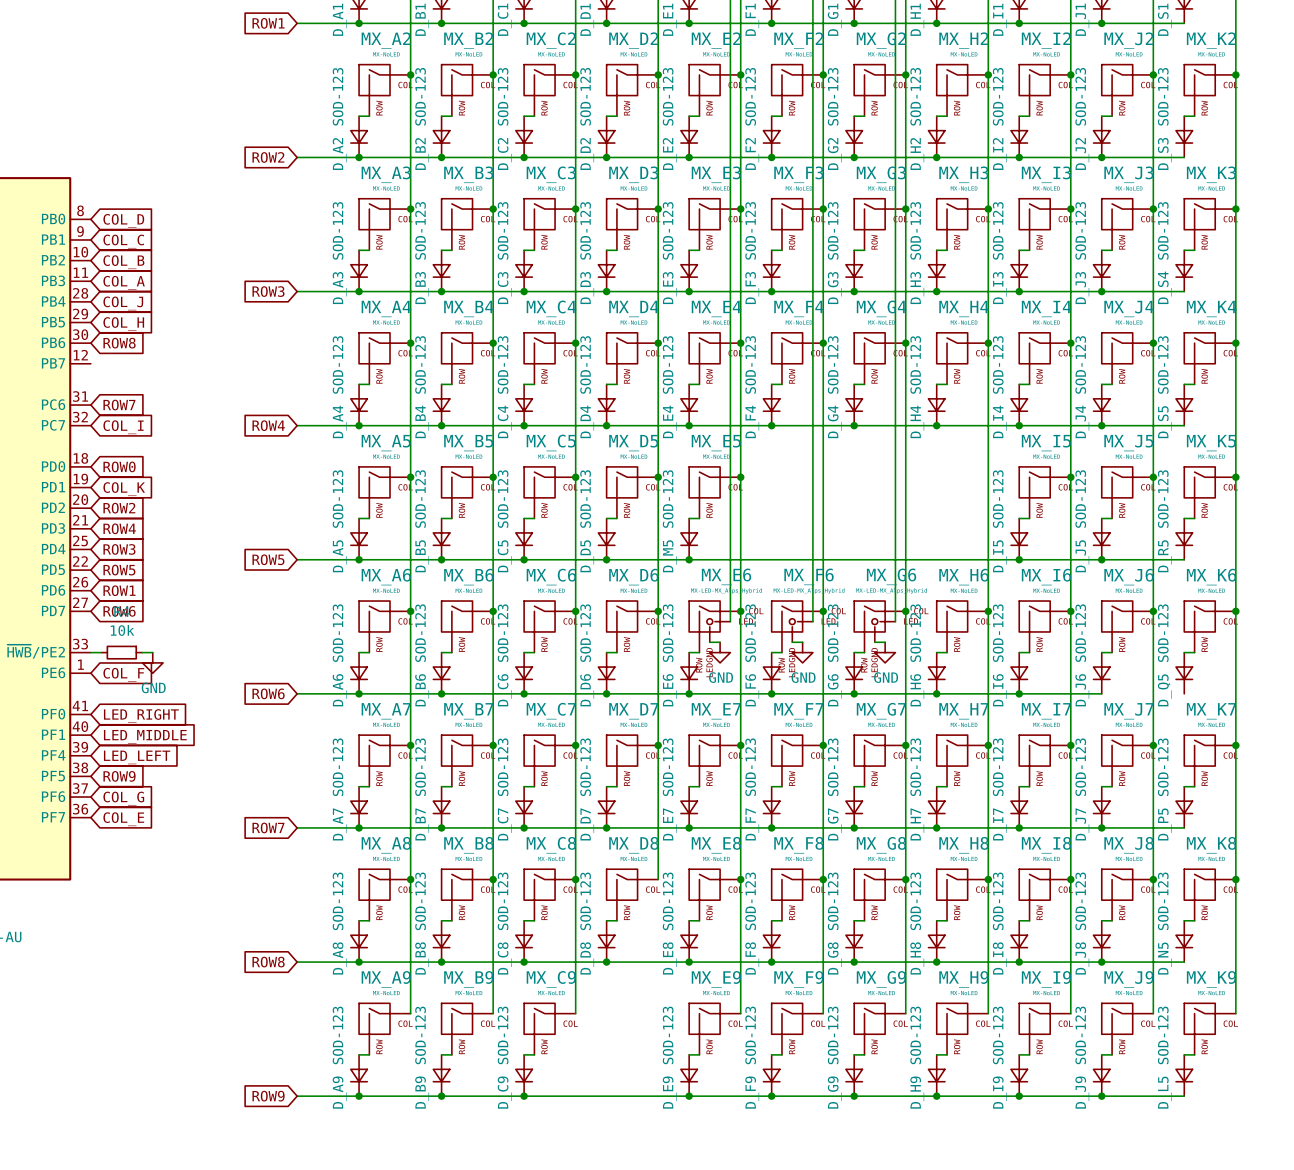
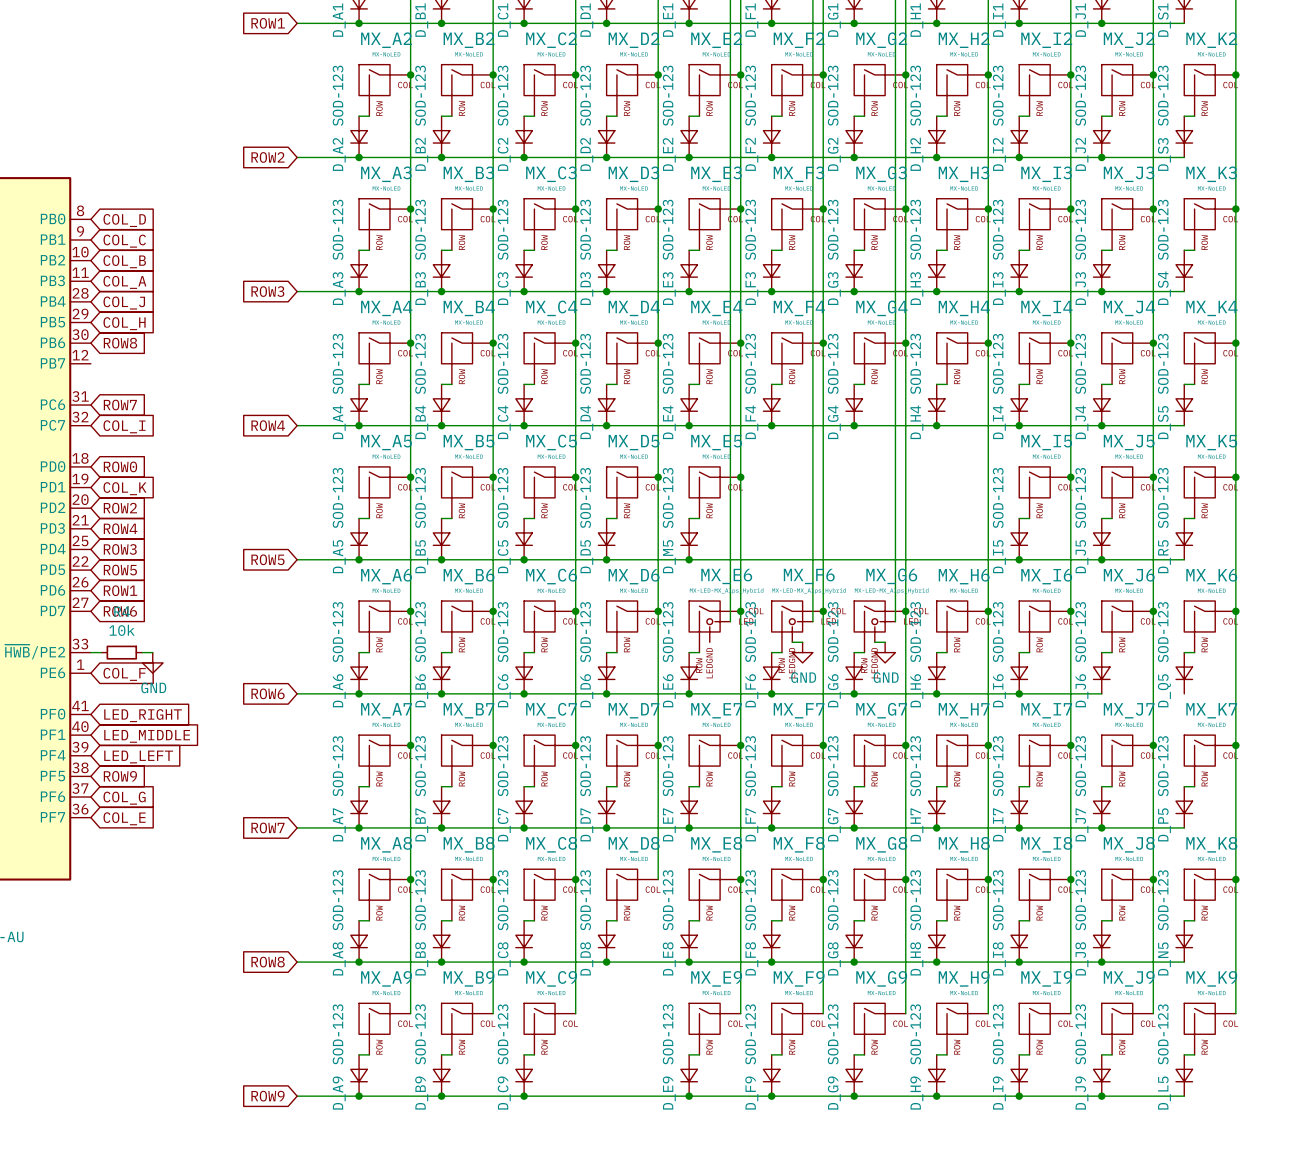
wire: (709, 642) (720, 642) -> none
power symbol: GND (720, 652) -> none

